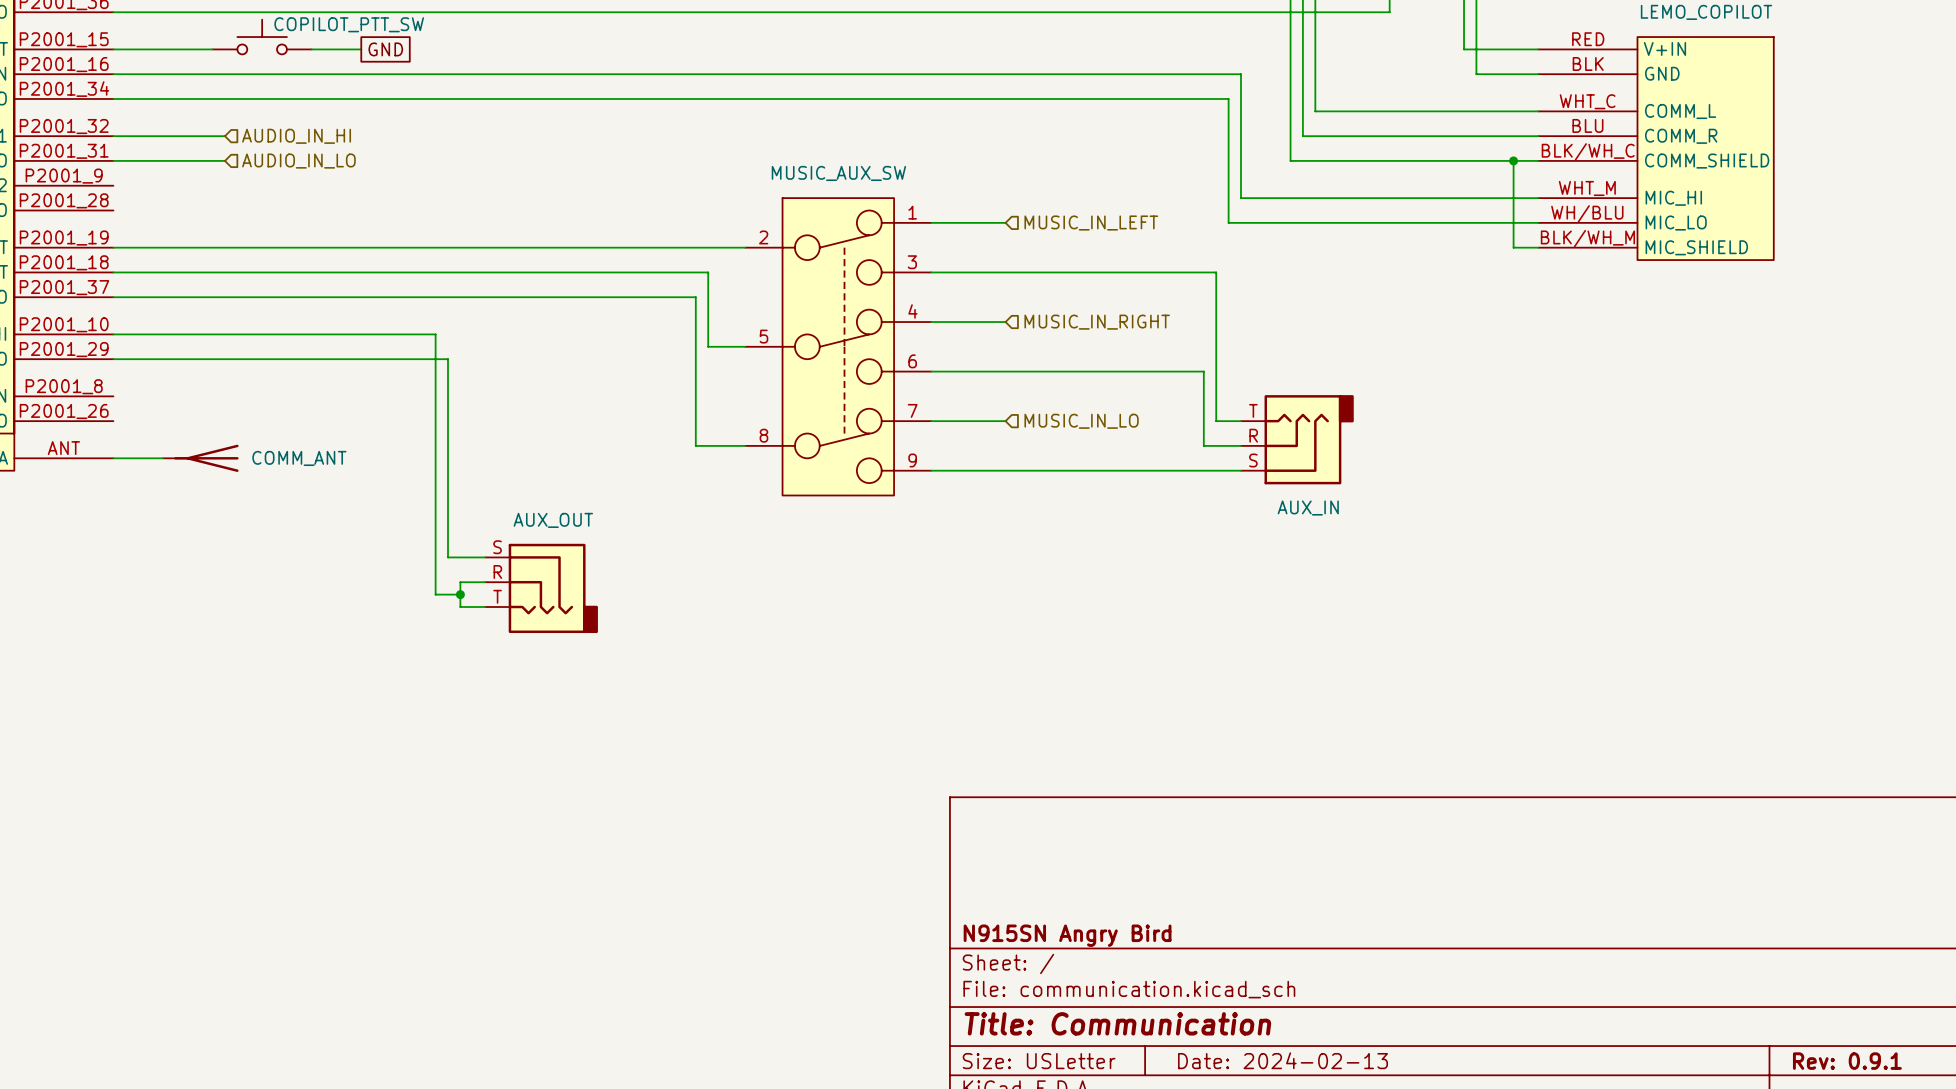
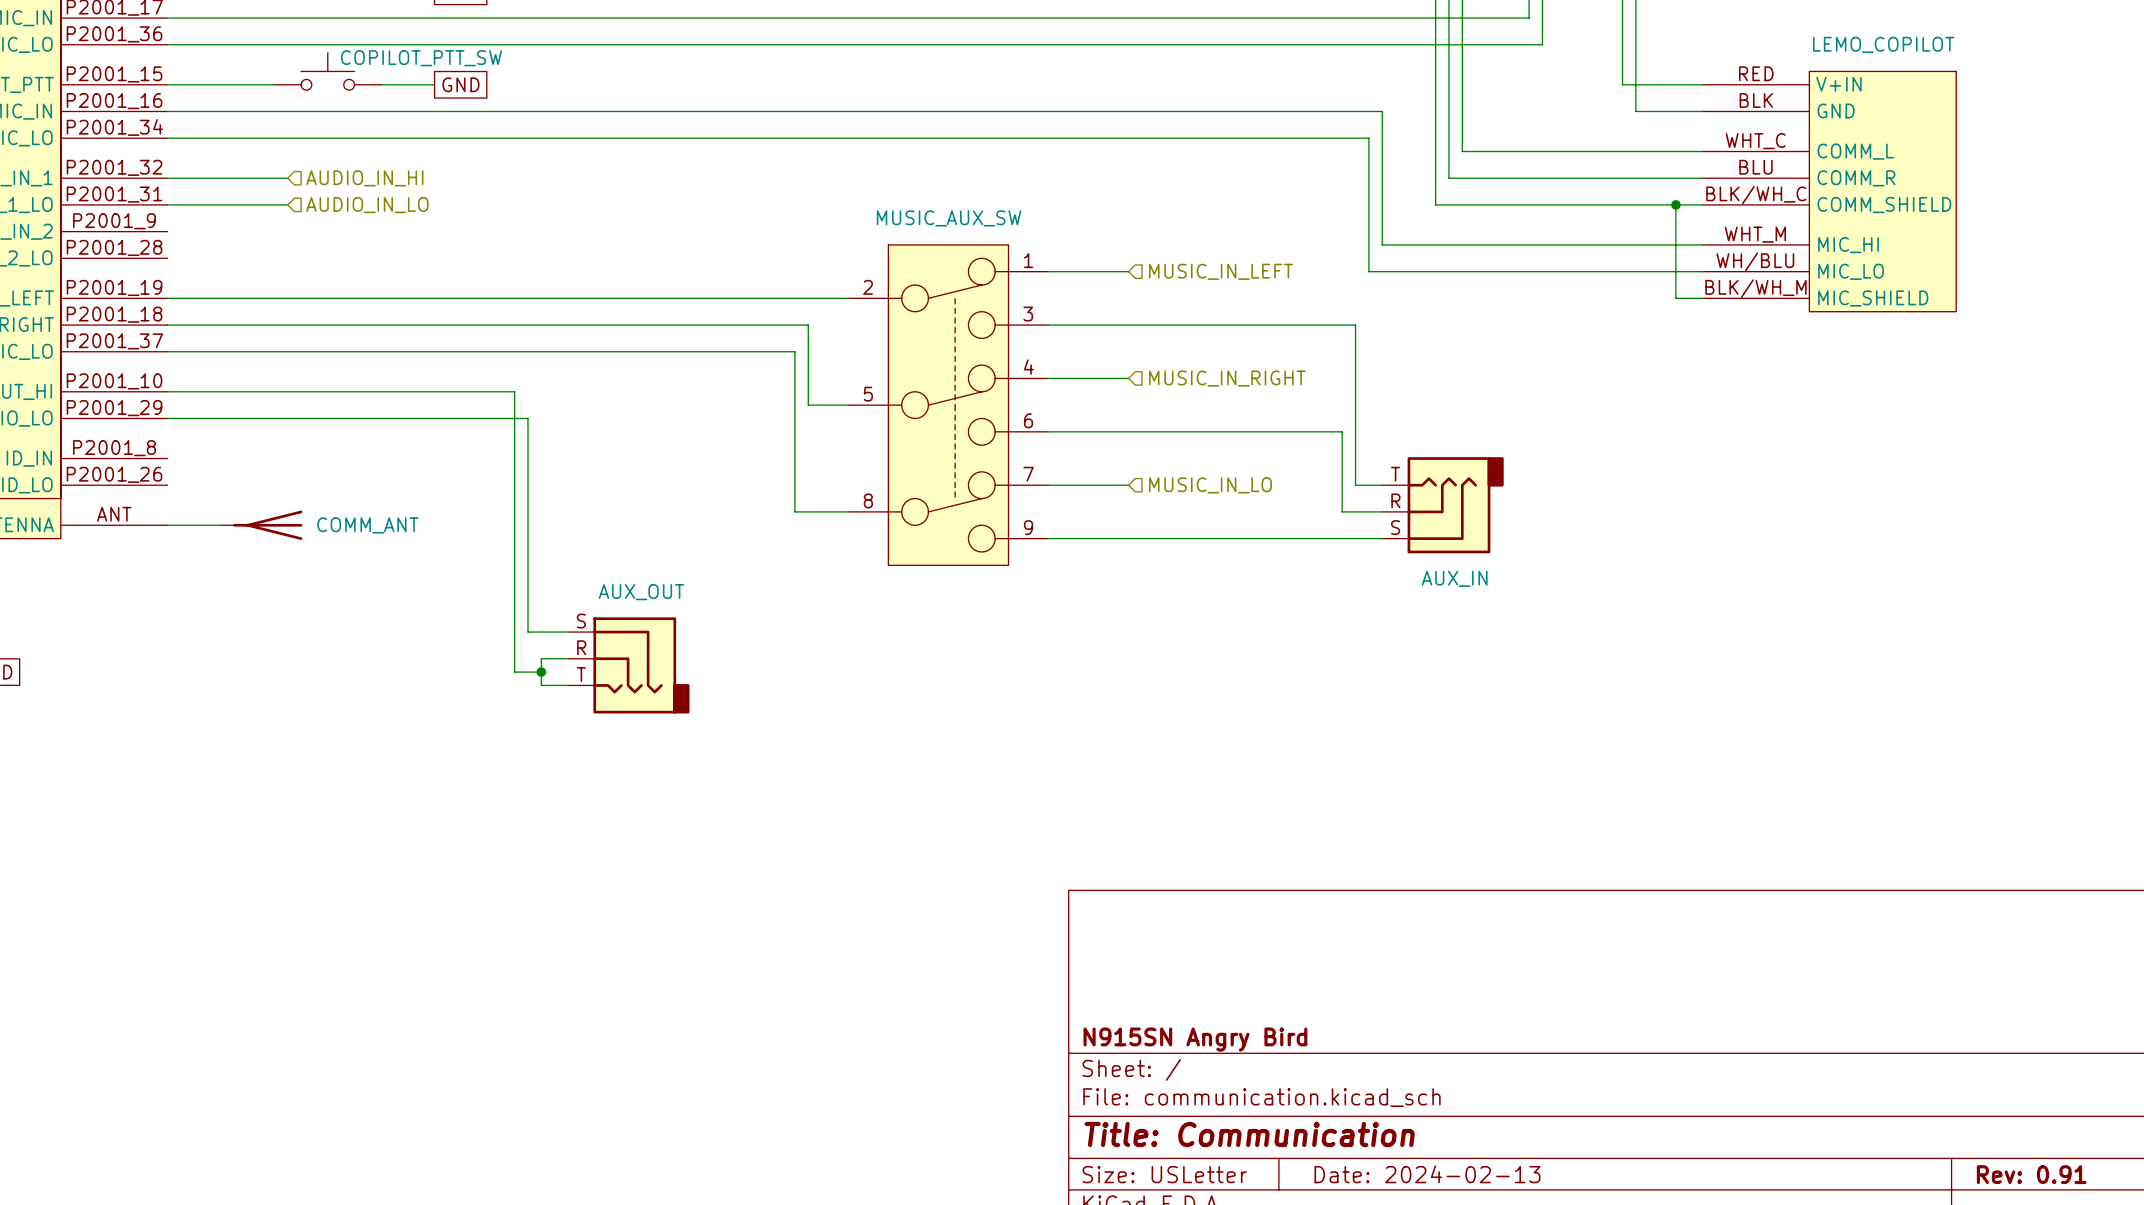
title block: Rev: 0.9.1 (1847, 1061) -> Rev: 0.91 (2031, 1174)

